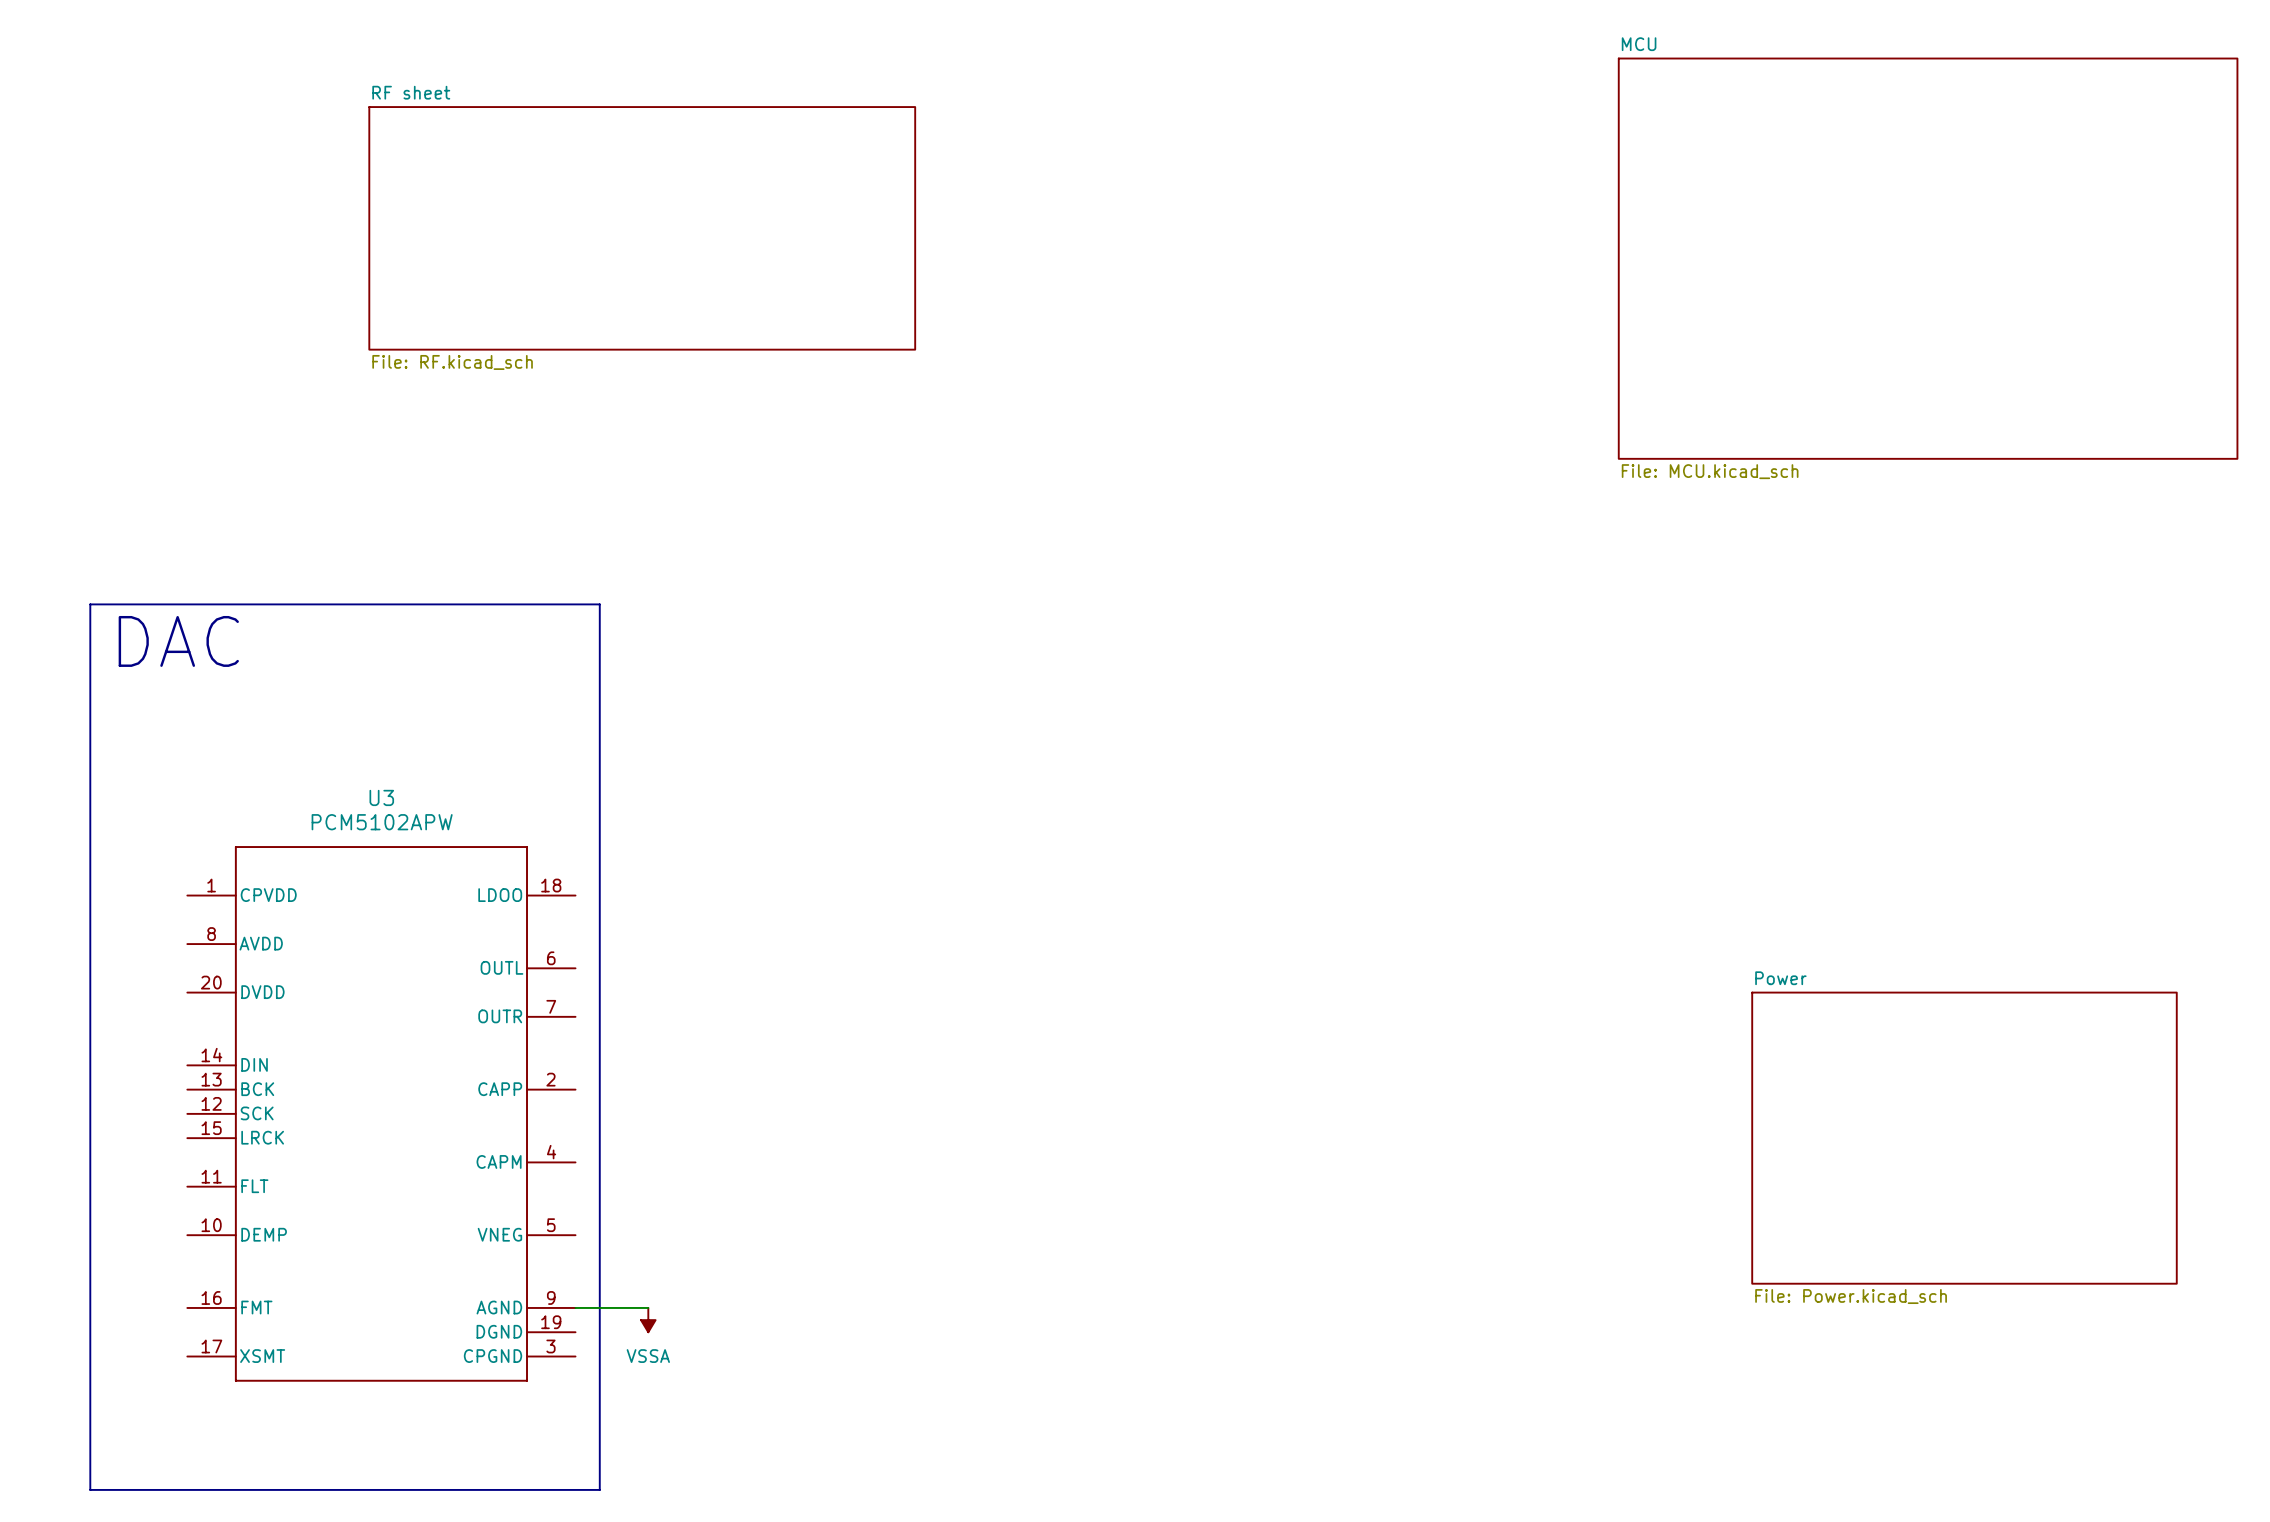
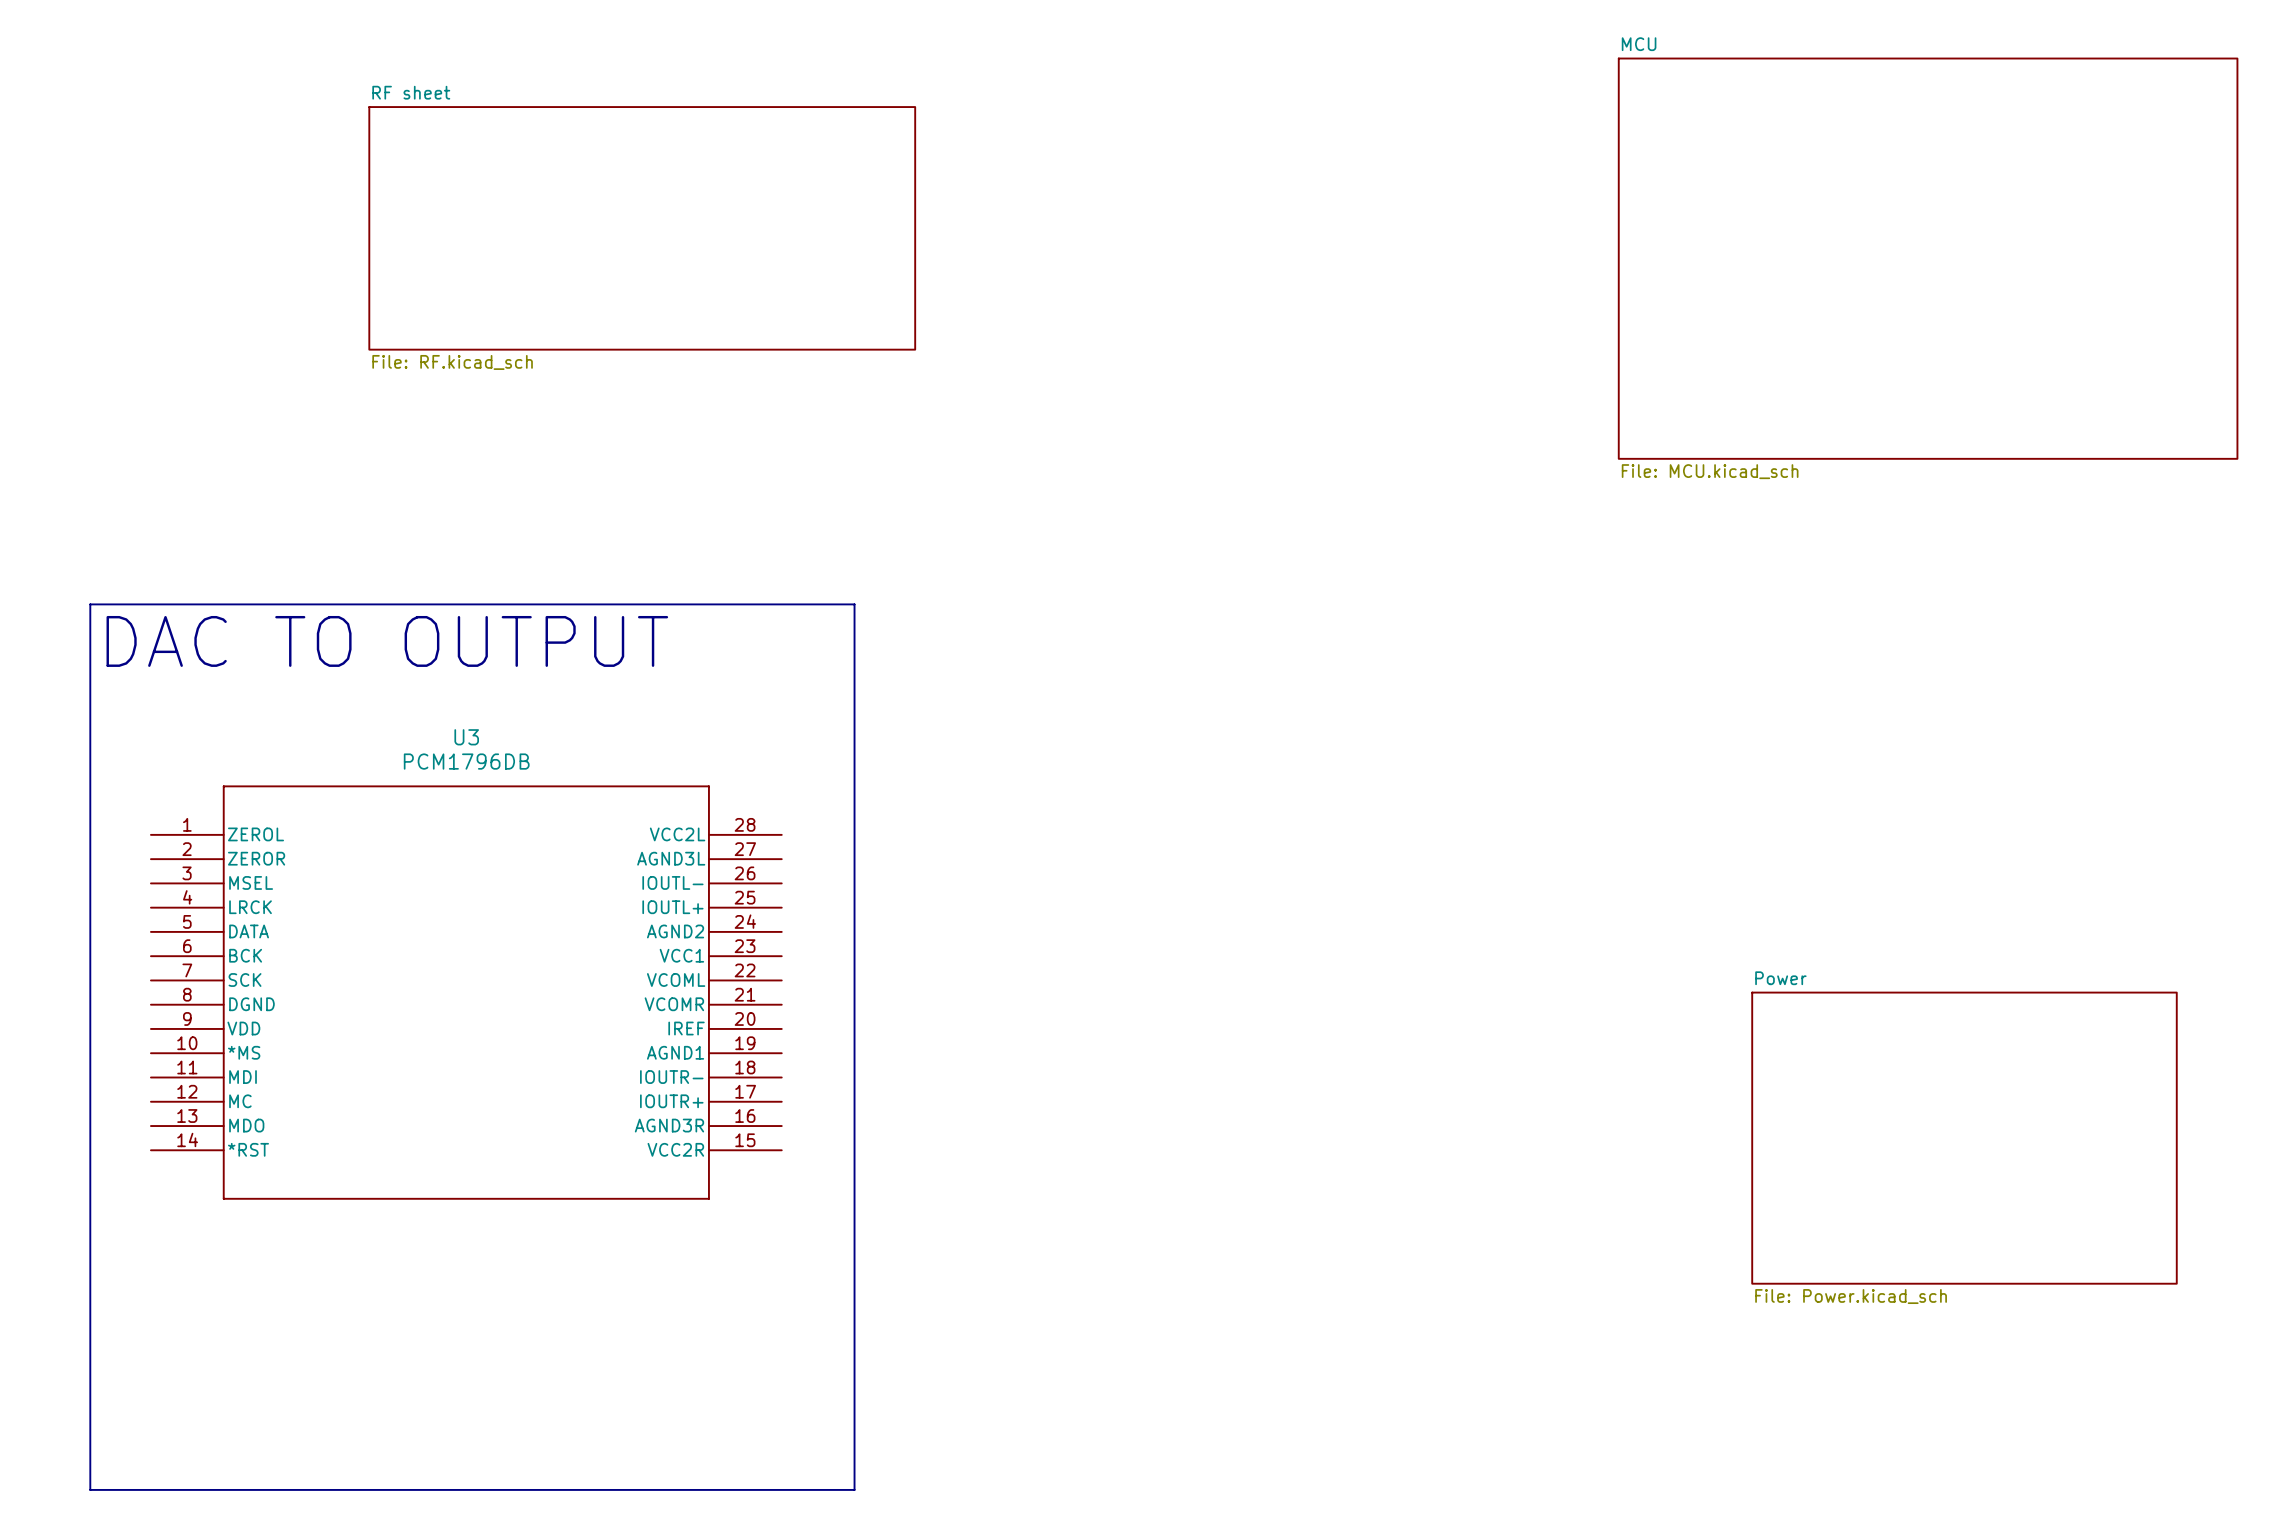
line: (599, 604) (599, 1489) -> (599, 604) (854, 604) (854, 1489) (599, 1489)
text: DAC (178, 641) -> none
text: none -> DAC TO OUTPUT (387, 641)
U3 name position: U3 (381, 797) -> U3 (466, 737)
U3 value: PCM5102APW (382, 822) -> PCM1796DB (466, 761)
U3 symbol: [187, 846, 576, 1382] -> [150, 785, 782, 1200]
wire: (575, 1307) (648, 1307) -> none
power symbol: VSSA (648, 1320) -> none

